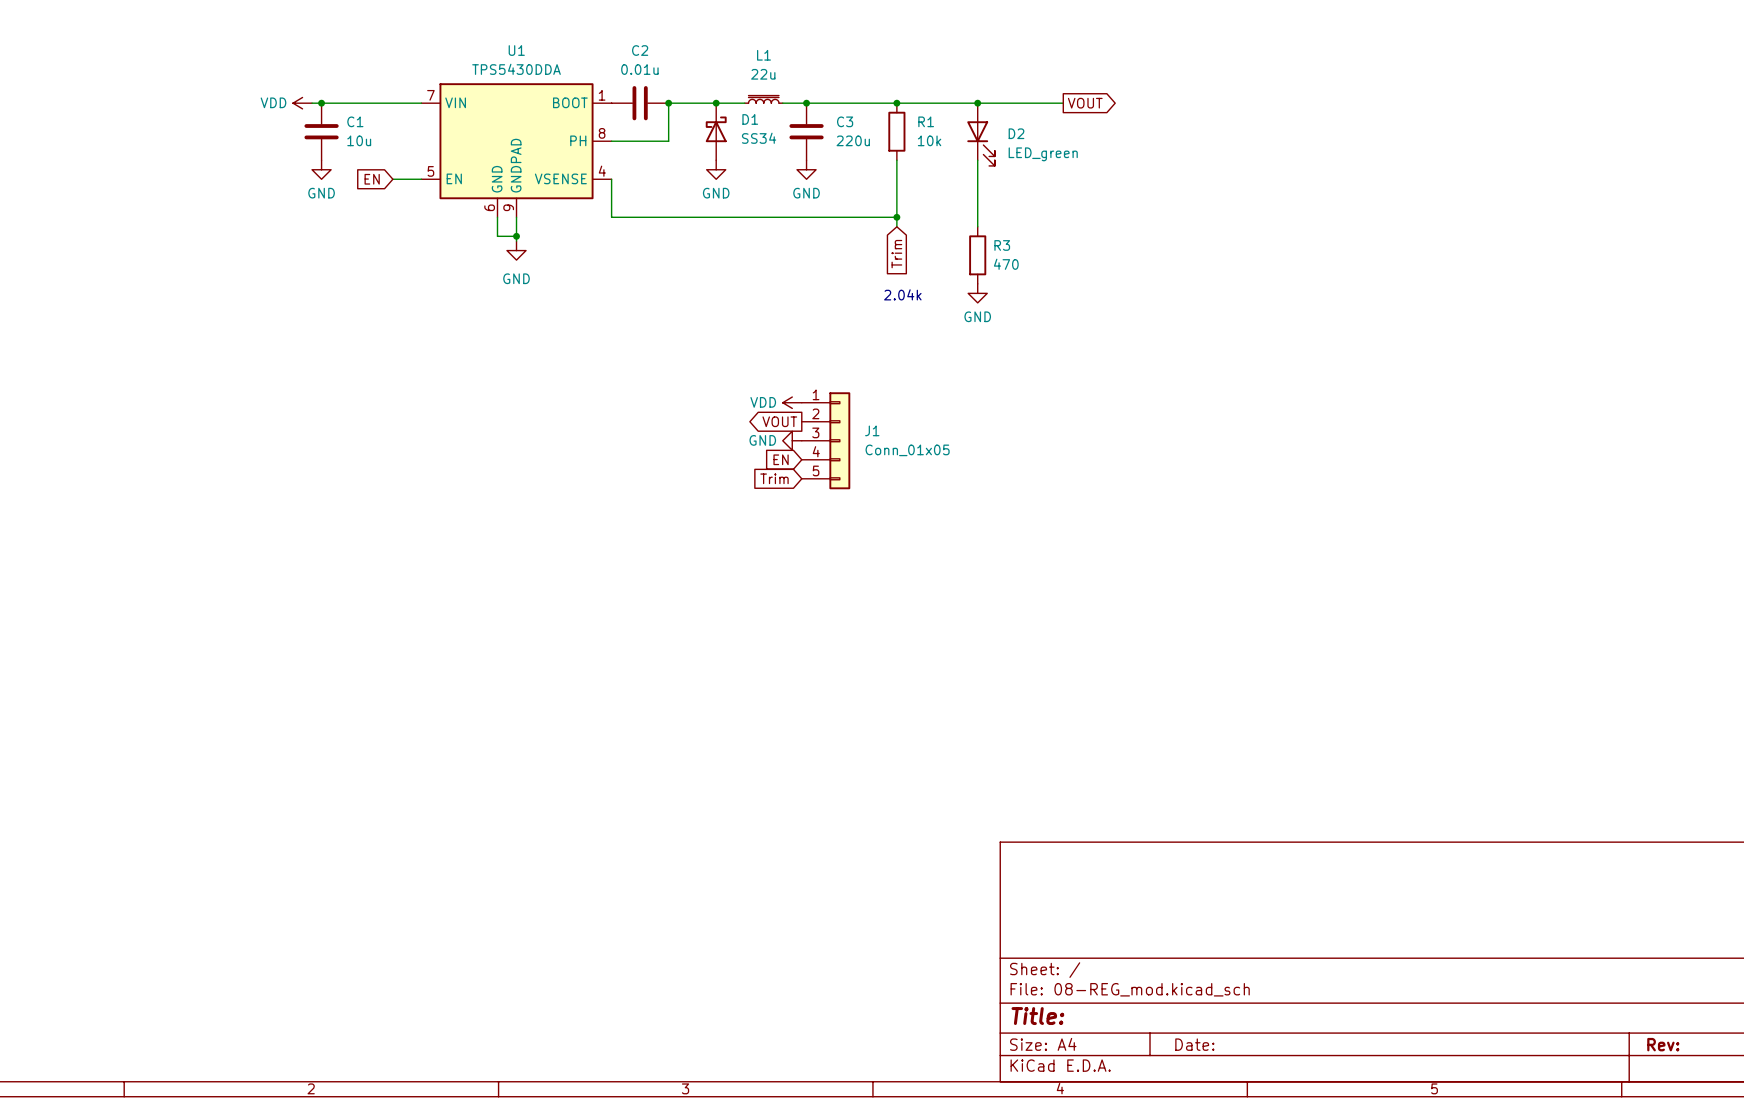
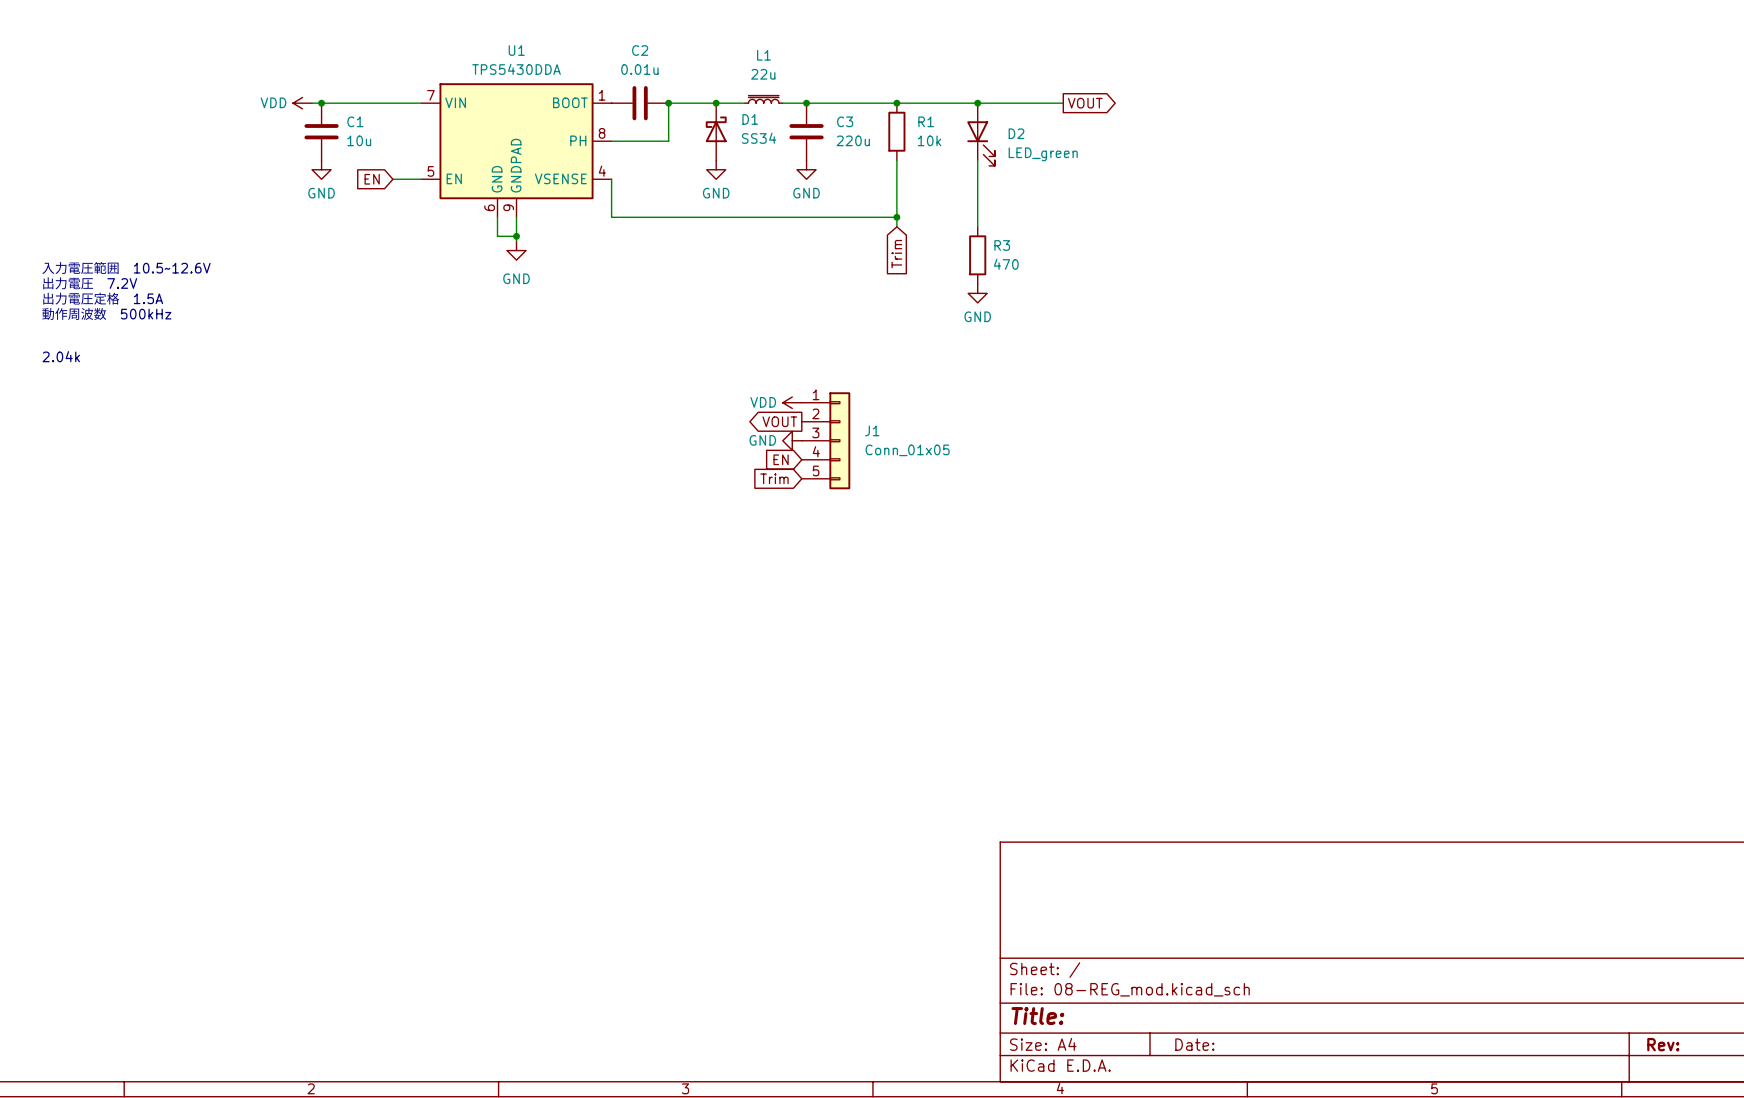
text: none -> 入力電圧範囲 10.5~12.6V (126, 268)
text: none -> 出力電圧 7.2V (89, 283)
text: 2.04k (902, 294) -> none
text: none -> 出力電圧定格 1.5A (102, 298)
text: none -> 動作周波数 500kHz (106, 313)
text: none -> 2.04k (61, 356)

